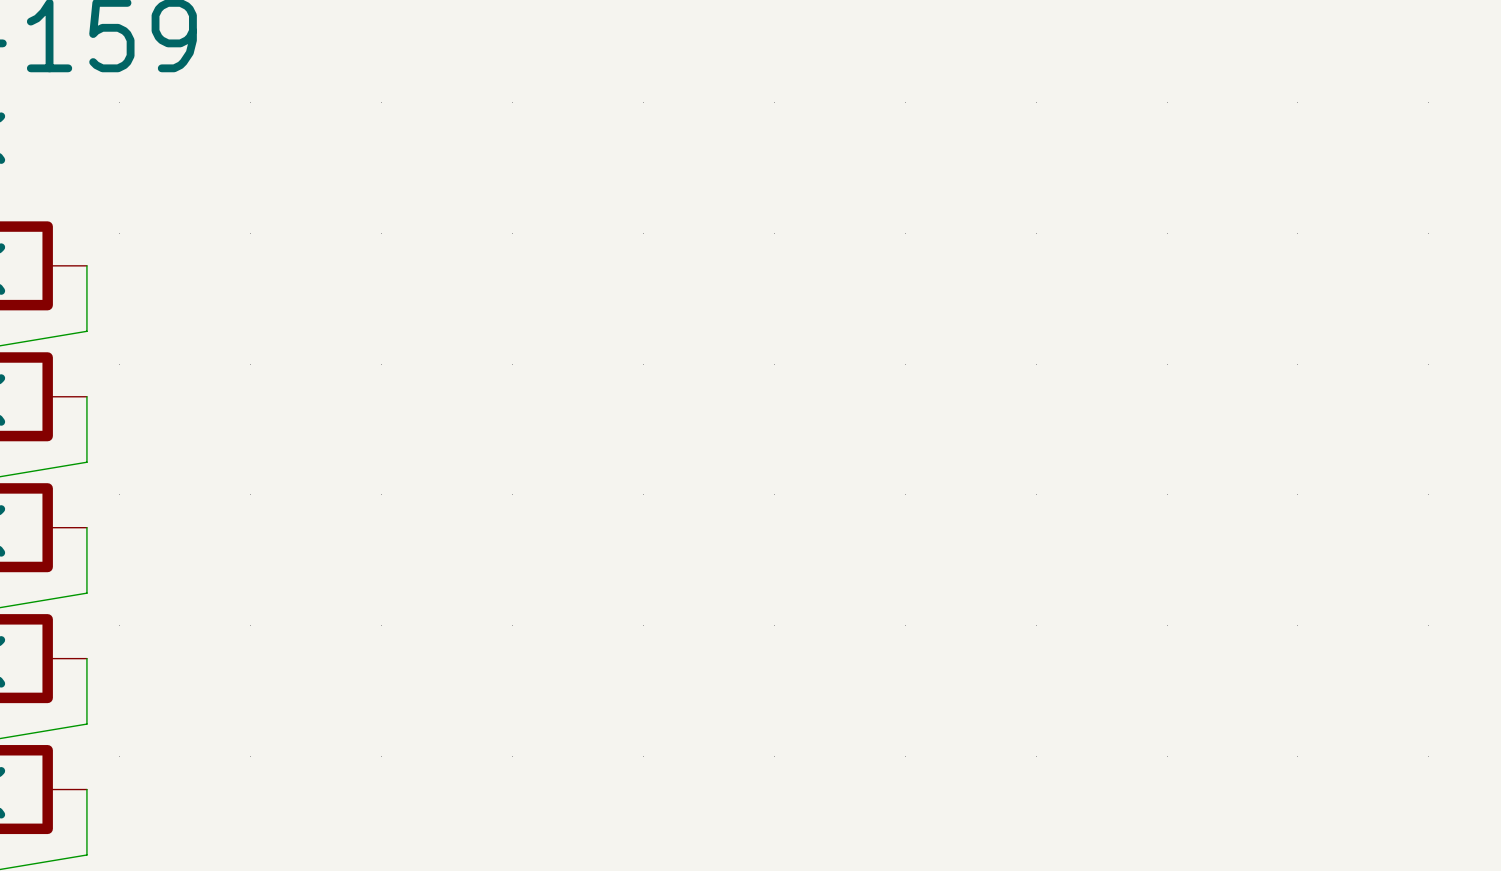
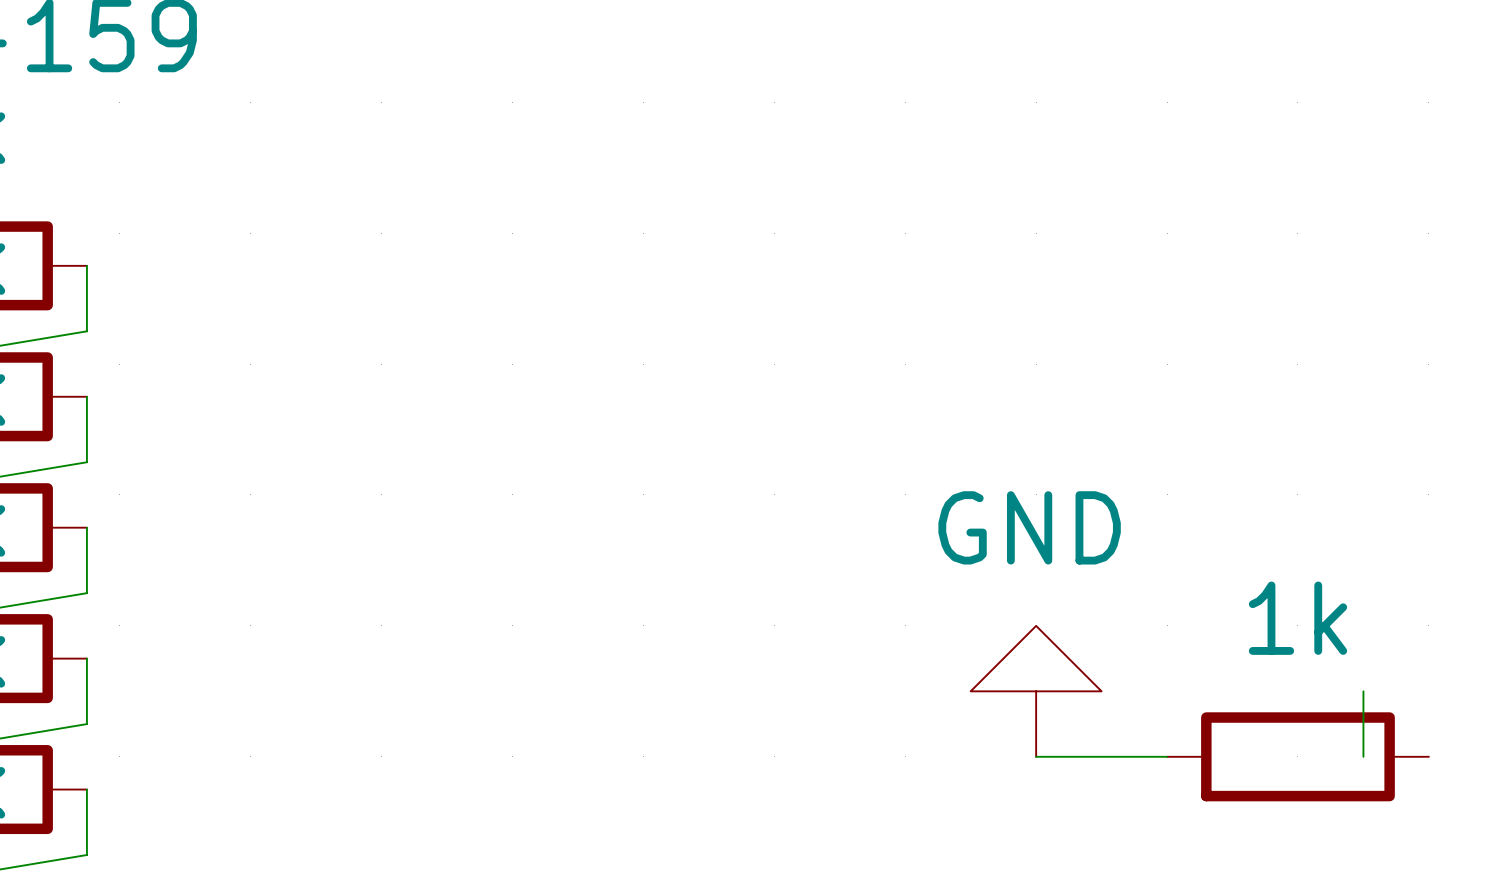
power symbol: none -> GND (1036, 691)
wire: none -> (1363, 691) (1363, 756)
wire: none -> (1036, 756) (1167, 756)
part: none -> 1k (1297, 756)

